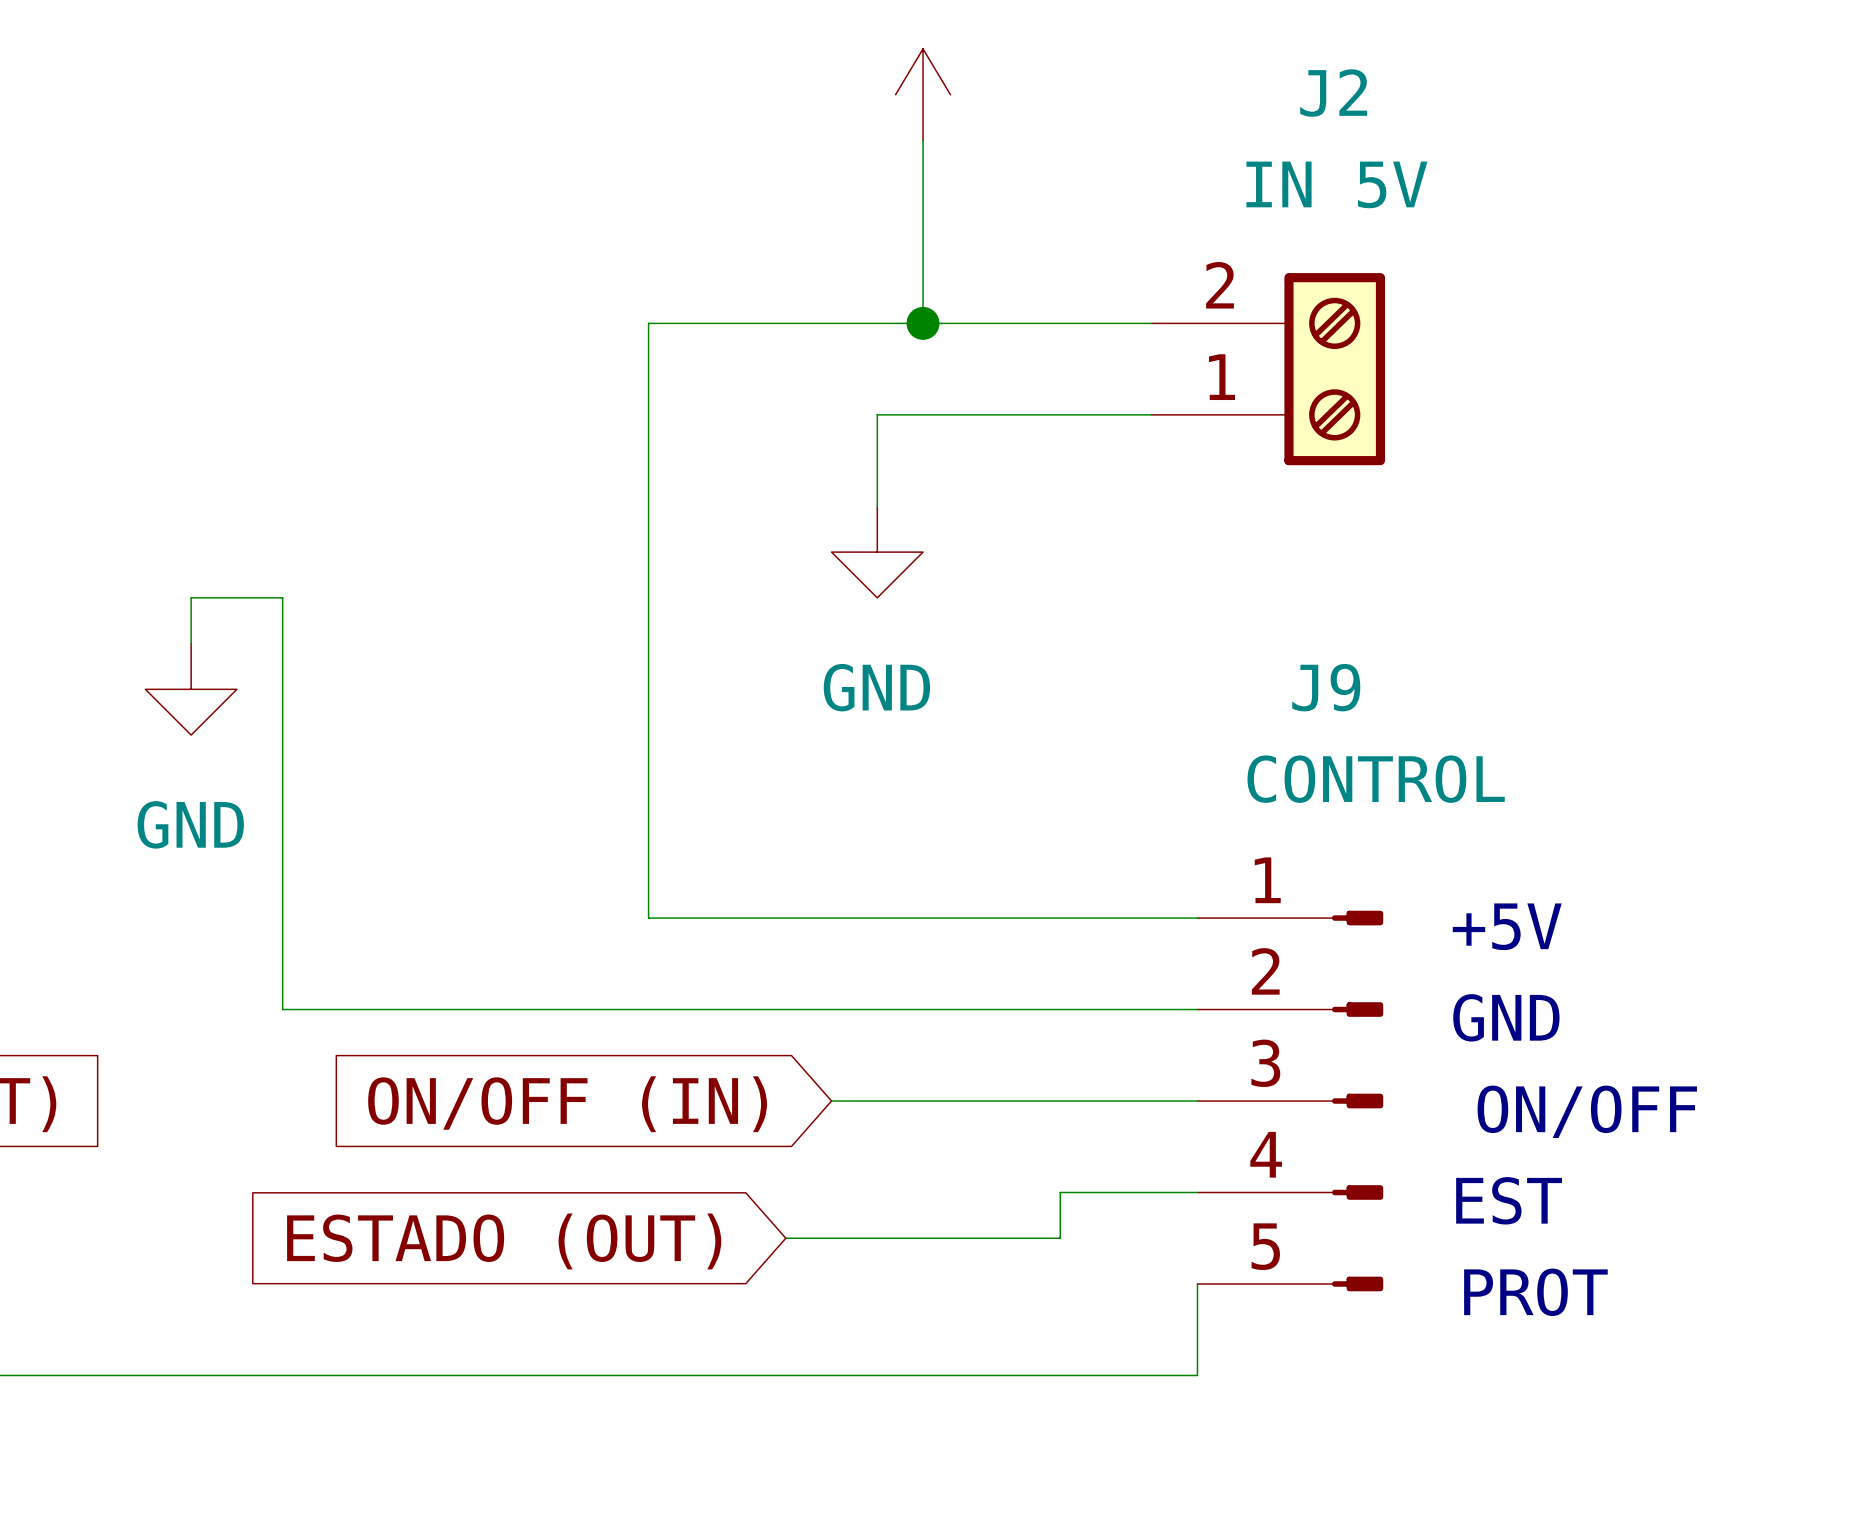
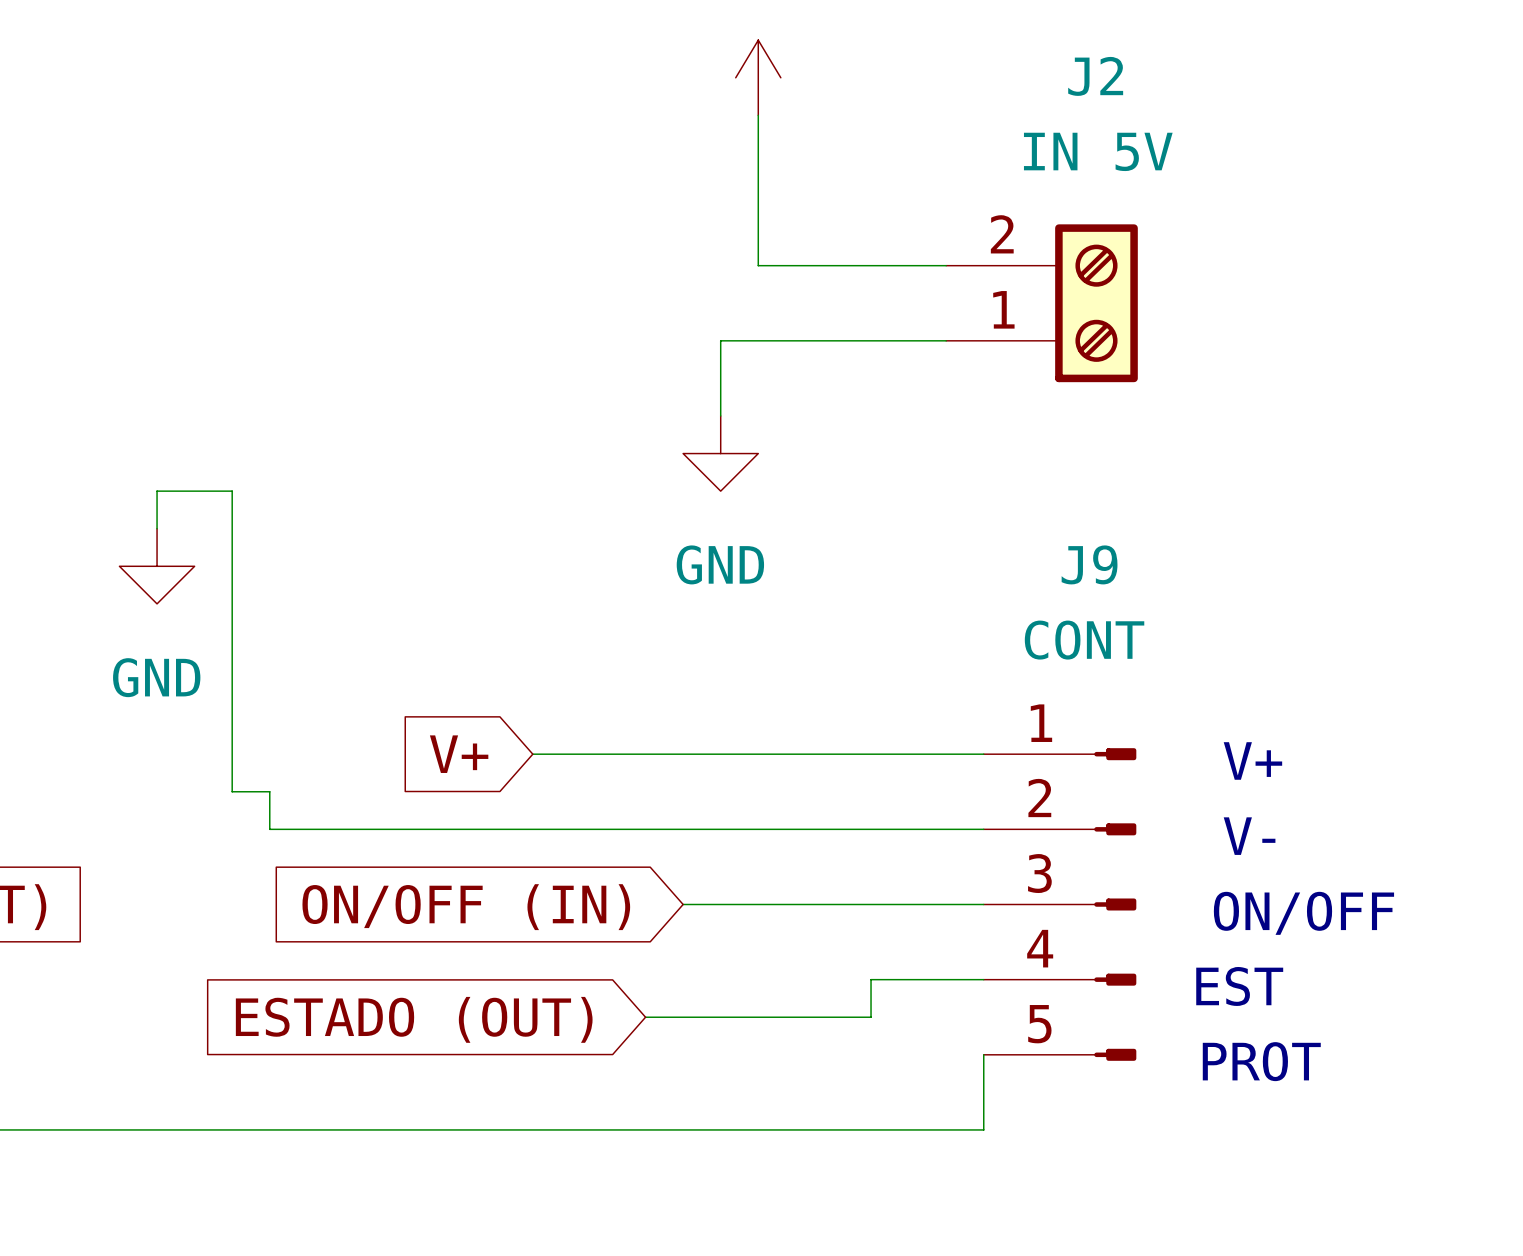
wire: (923, 323) (648, 323) (648, 918) -> none
junction: (923, 323) -> none
J9 value: CONTROL (1376, 779) -> CONT (1084, 640)
global label: none -> V+ (459, 754)
text: +5V (1507, 926) -> V+ (1252, 760)
wire: (282, 963) (282, 1009) (328, 1009) -> (232, 791) (269, 791) (269, 829)
text: GND (1506, 1017) -> V- (1249, 836)

